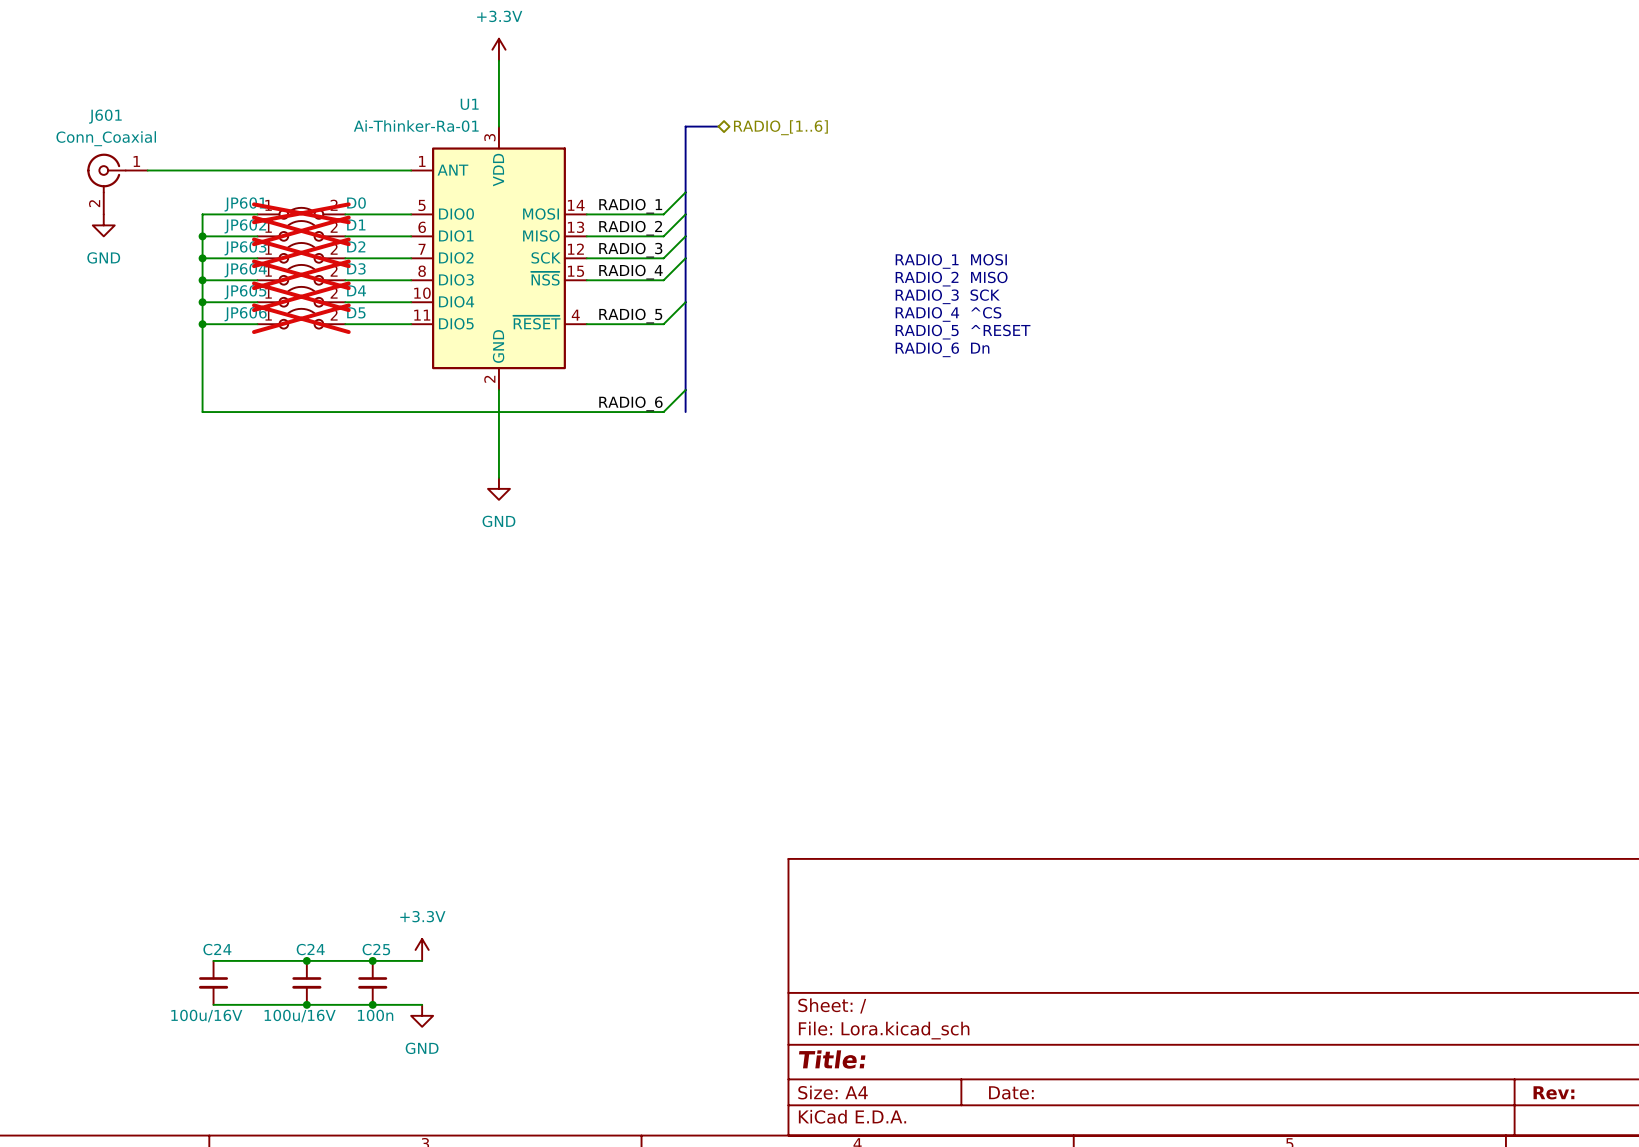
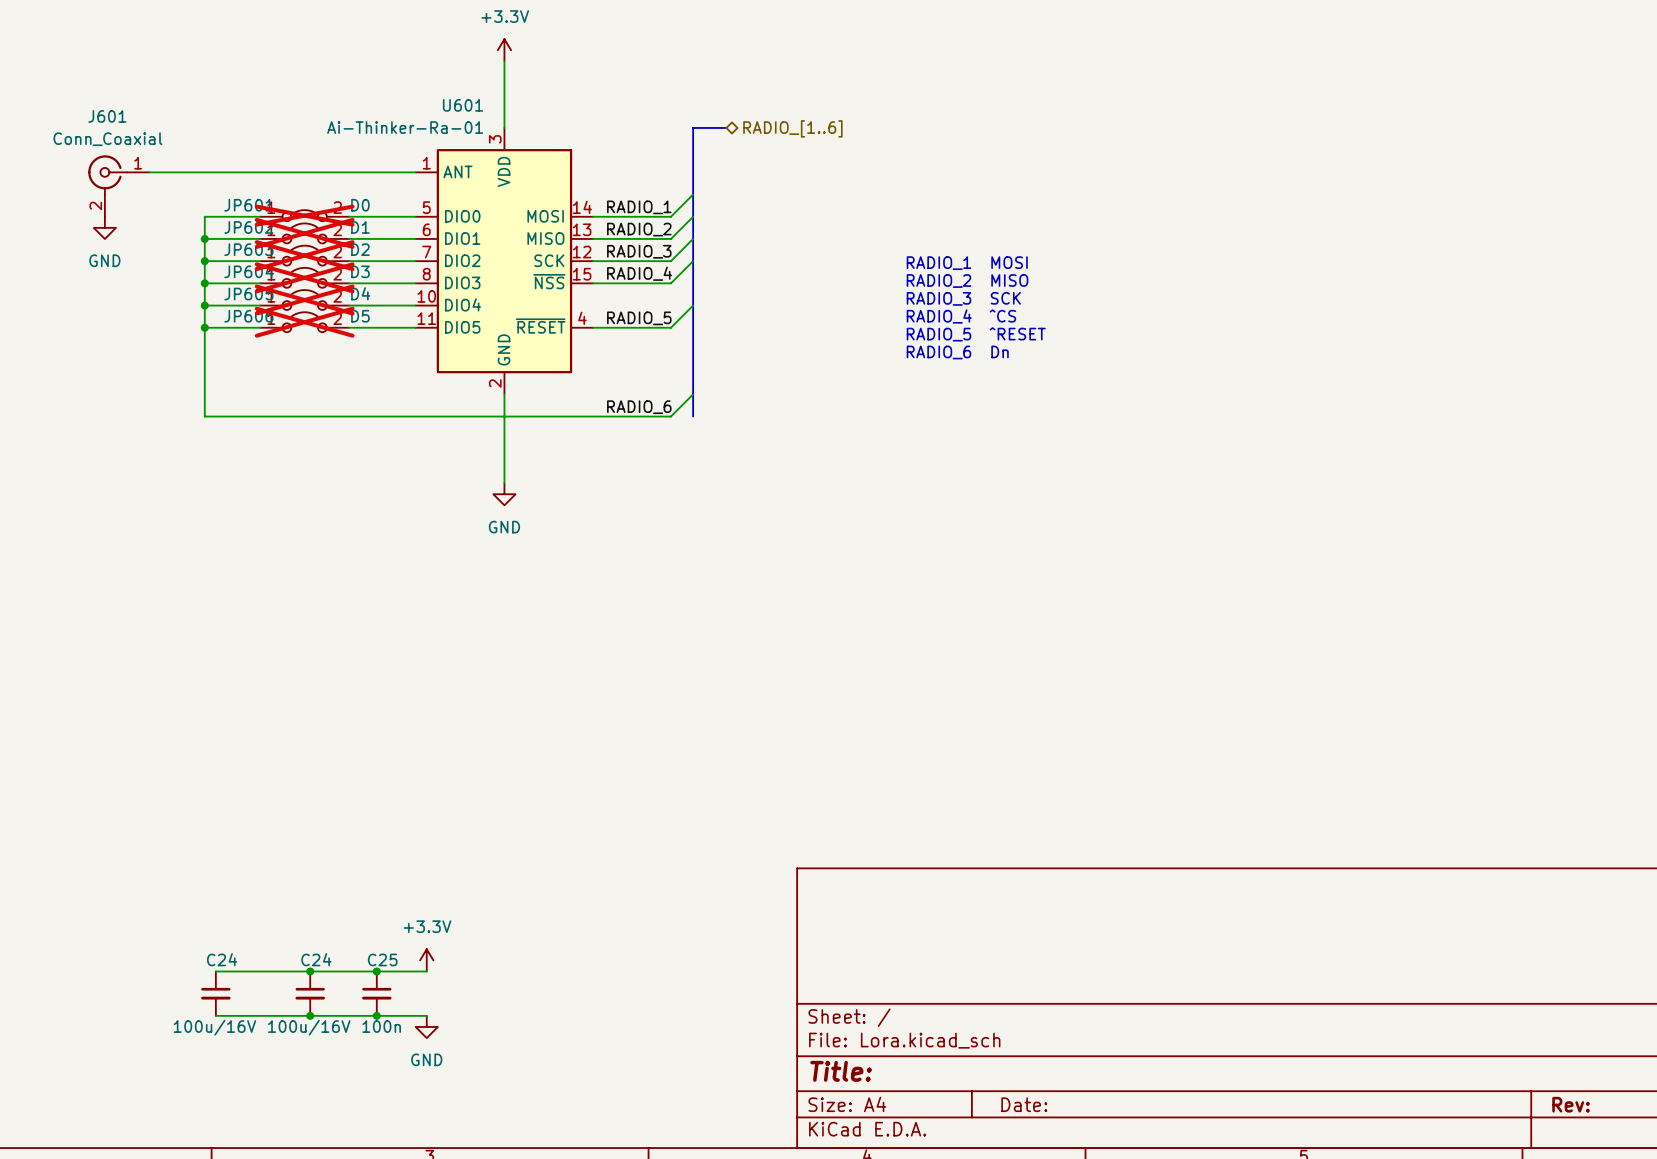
U1 name: U1 (469, 104) -> U601 (462, 105)

